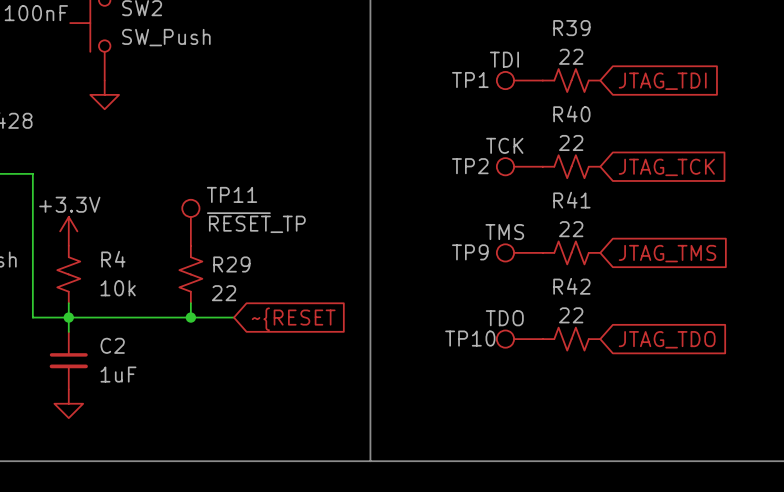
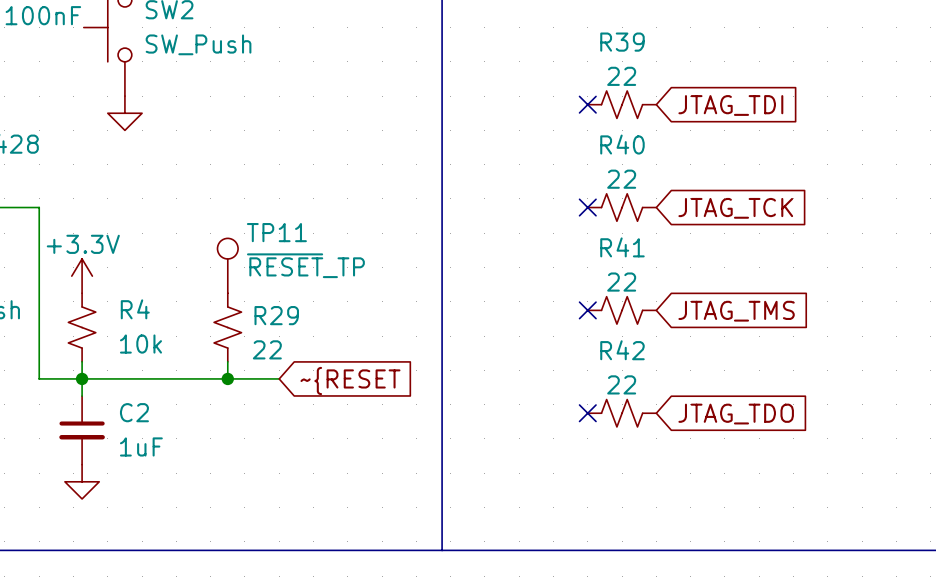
TP1: TDI (519, 80) -> none
R39 position: (571, 80) -> (622, 104)
global label position: JTAG_TDI (662, 81) -> JTAG_TDI (730, 105)
no-connect mark: none -> (587, 104)
TP2: TCK (519, 166) -> none
R40 position: (571, 166) -> (622, 207)
global label position: JTAG_TCK (666, 167) -> JTAG_TCK (735, 208)
no-connect mark: none -> (587, 207)
TP9: TMS (519, 252) -> none
R41 position: (571, 252) -> (622, 310)
global label position: JTAG_TMS (667, 253) -> JTAG_TMS (736, 311)
no-connect mark: none -> (587, 310)
TP10: TDO (519, 339) -> none
R42 position: (571, 339) -> (622, 413)
global label position: JTAG_TDO (667, 339) -> JTAG_TDO (736, 414)
no-connect mark: none -> (587, 413)

